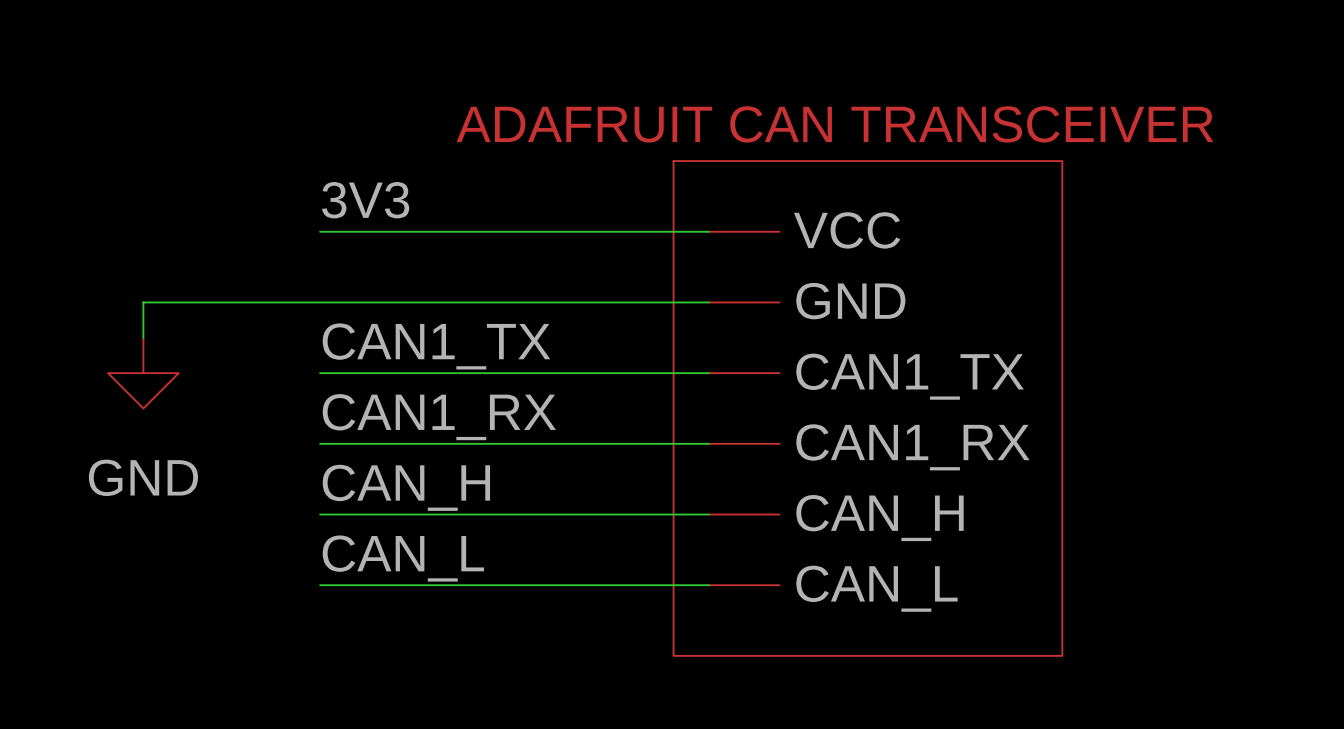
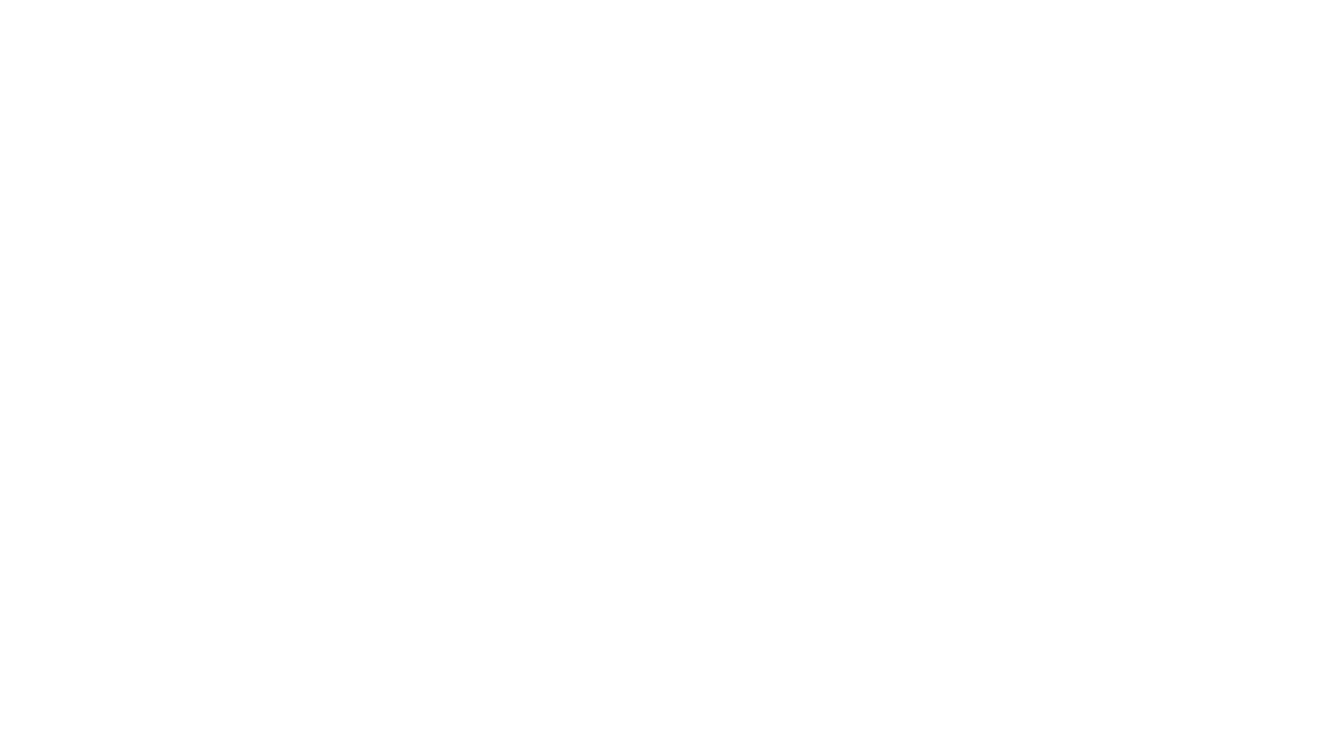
label: 3V3 (365, 200) -> none
wire: (320, 231) (708, 231) -> none
wire: (708, 302) (143, 302) (143, 337) -> none
label: CAN1_TX (436, 346) -> none
power symbol: GND (143, 373) -> none
wire: (320, 373) (708, 373) -> none
part: (867, 408) -> none
label: CAN1_RX (439, 417) -> none
wire: (320, 443) (708, 443) -> none
label: CAN_H (406, 487) -> none
wire: (320, 514) (708, 514) -> none
label: CAN_L (403, 558) -> none
wire: (320, 585) (708, 585) -> none

